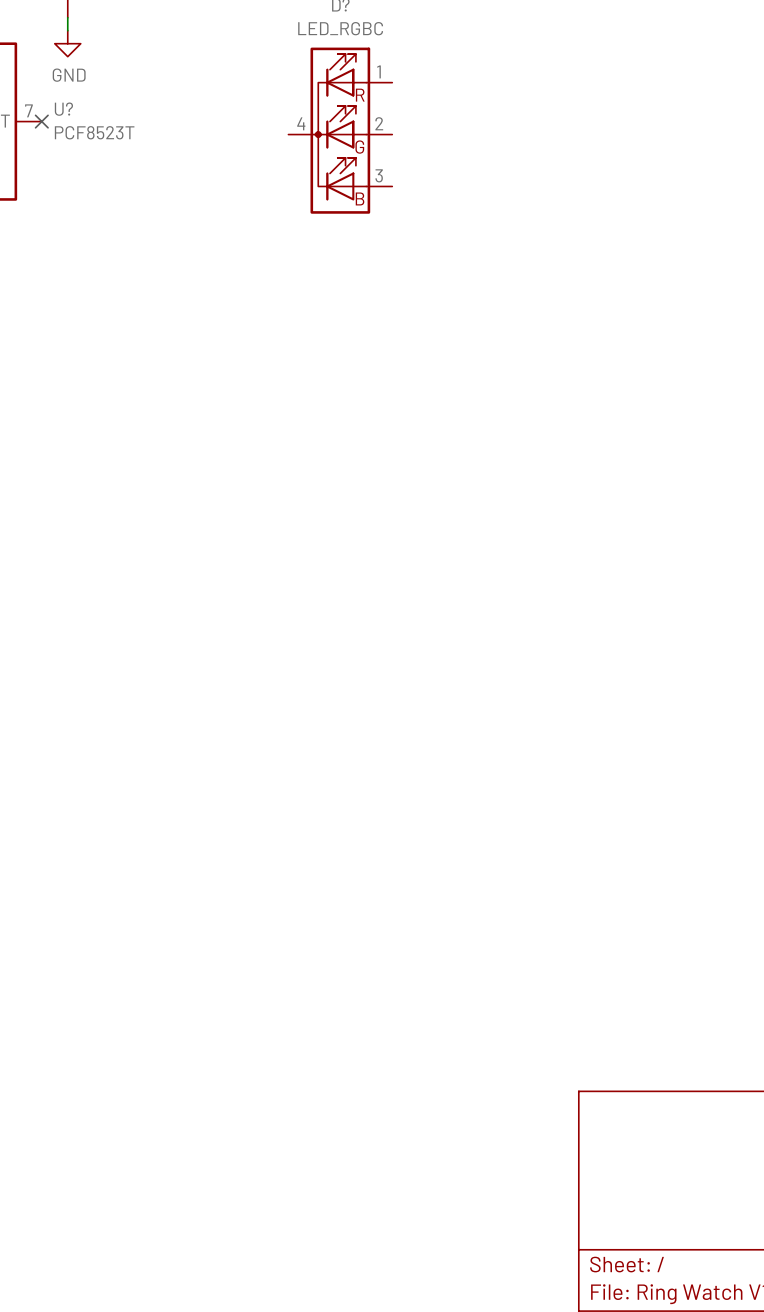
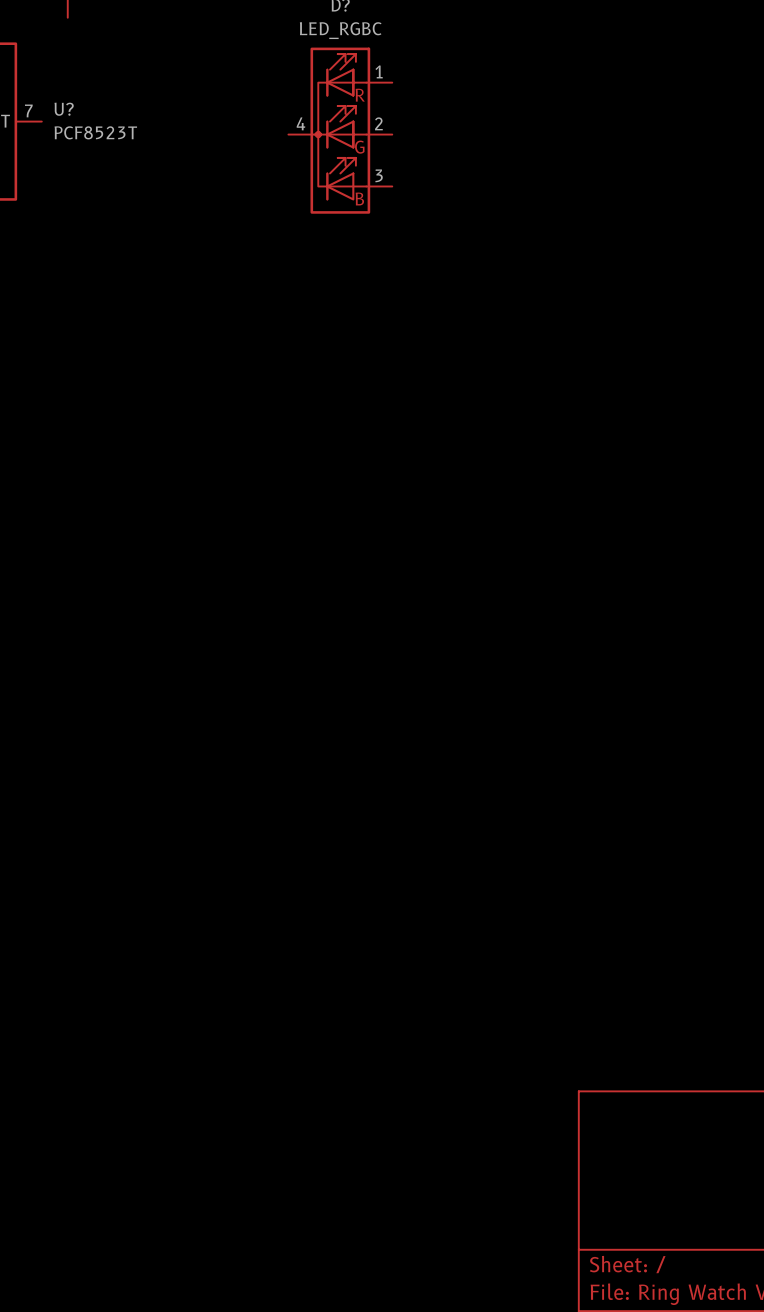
wire: (67, 17) (67, 30) -> none
power symbol: GND (67, 43) -> none
no-connect mark: (41, 121) -> none

